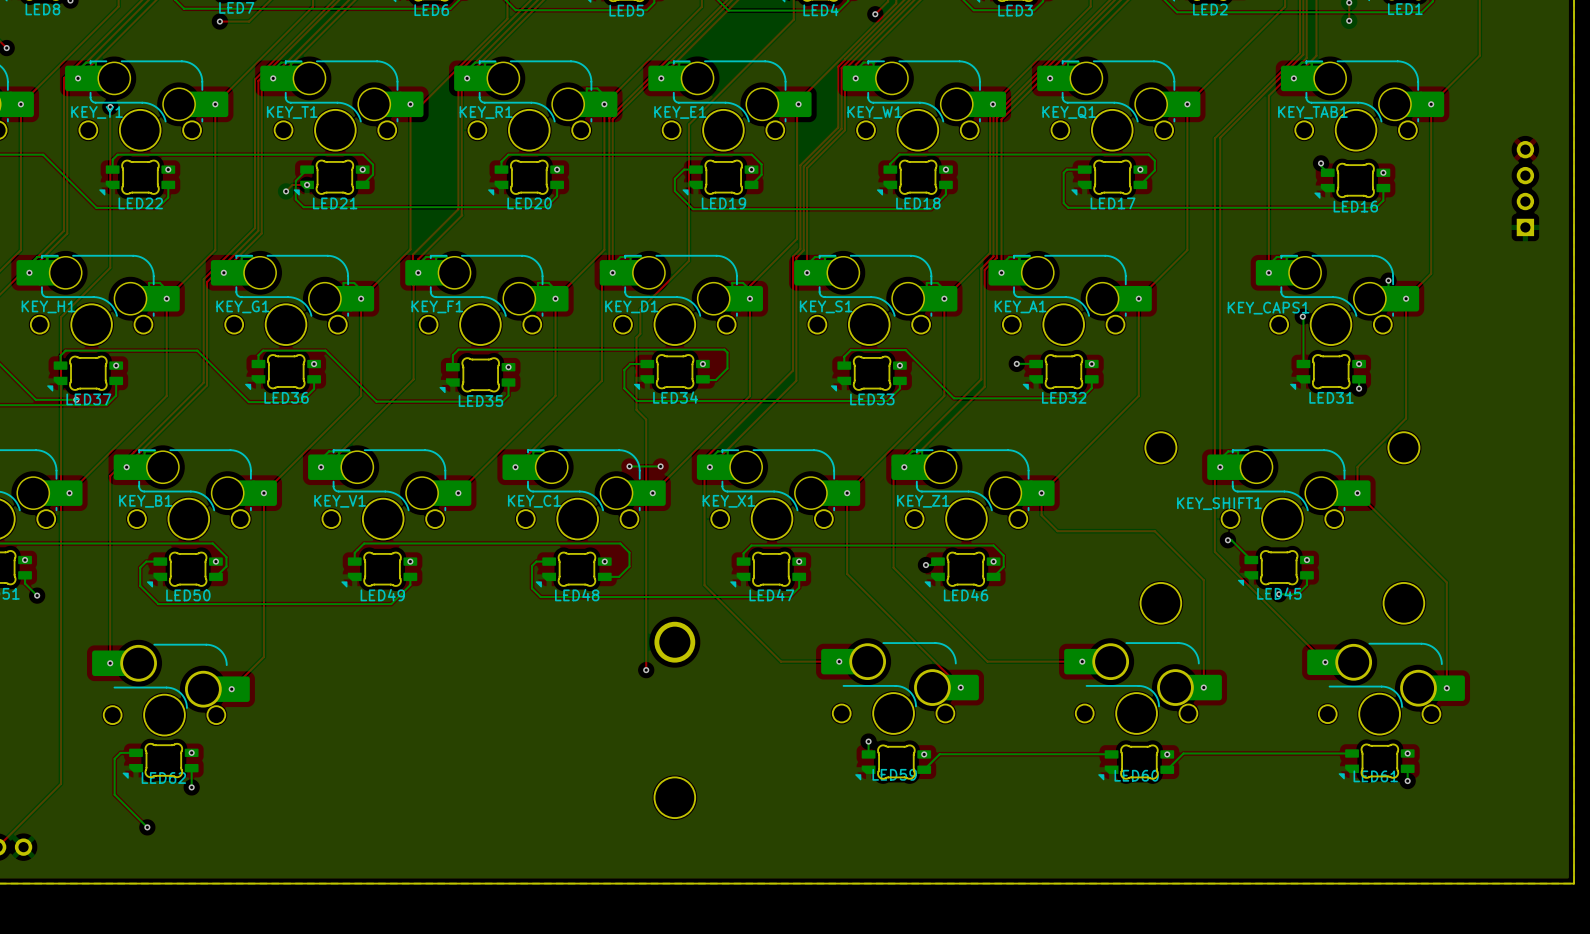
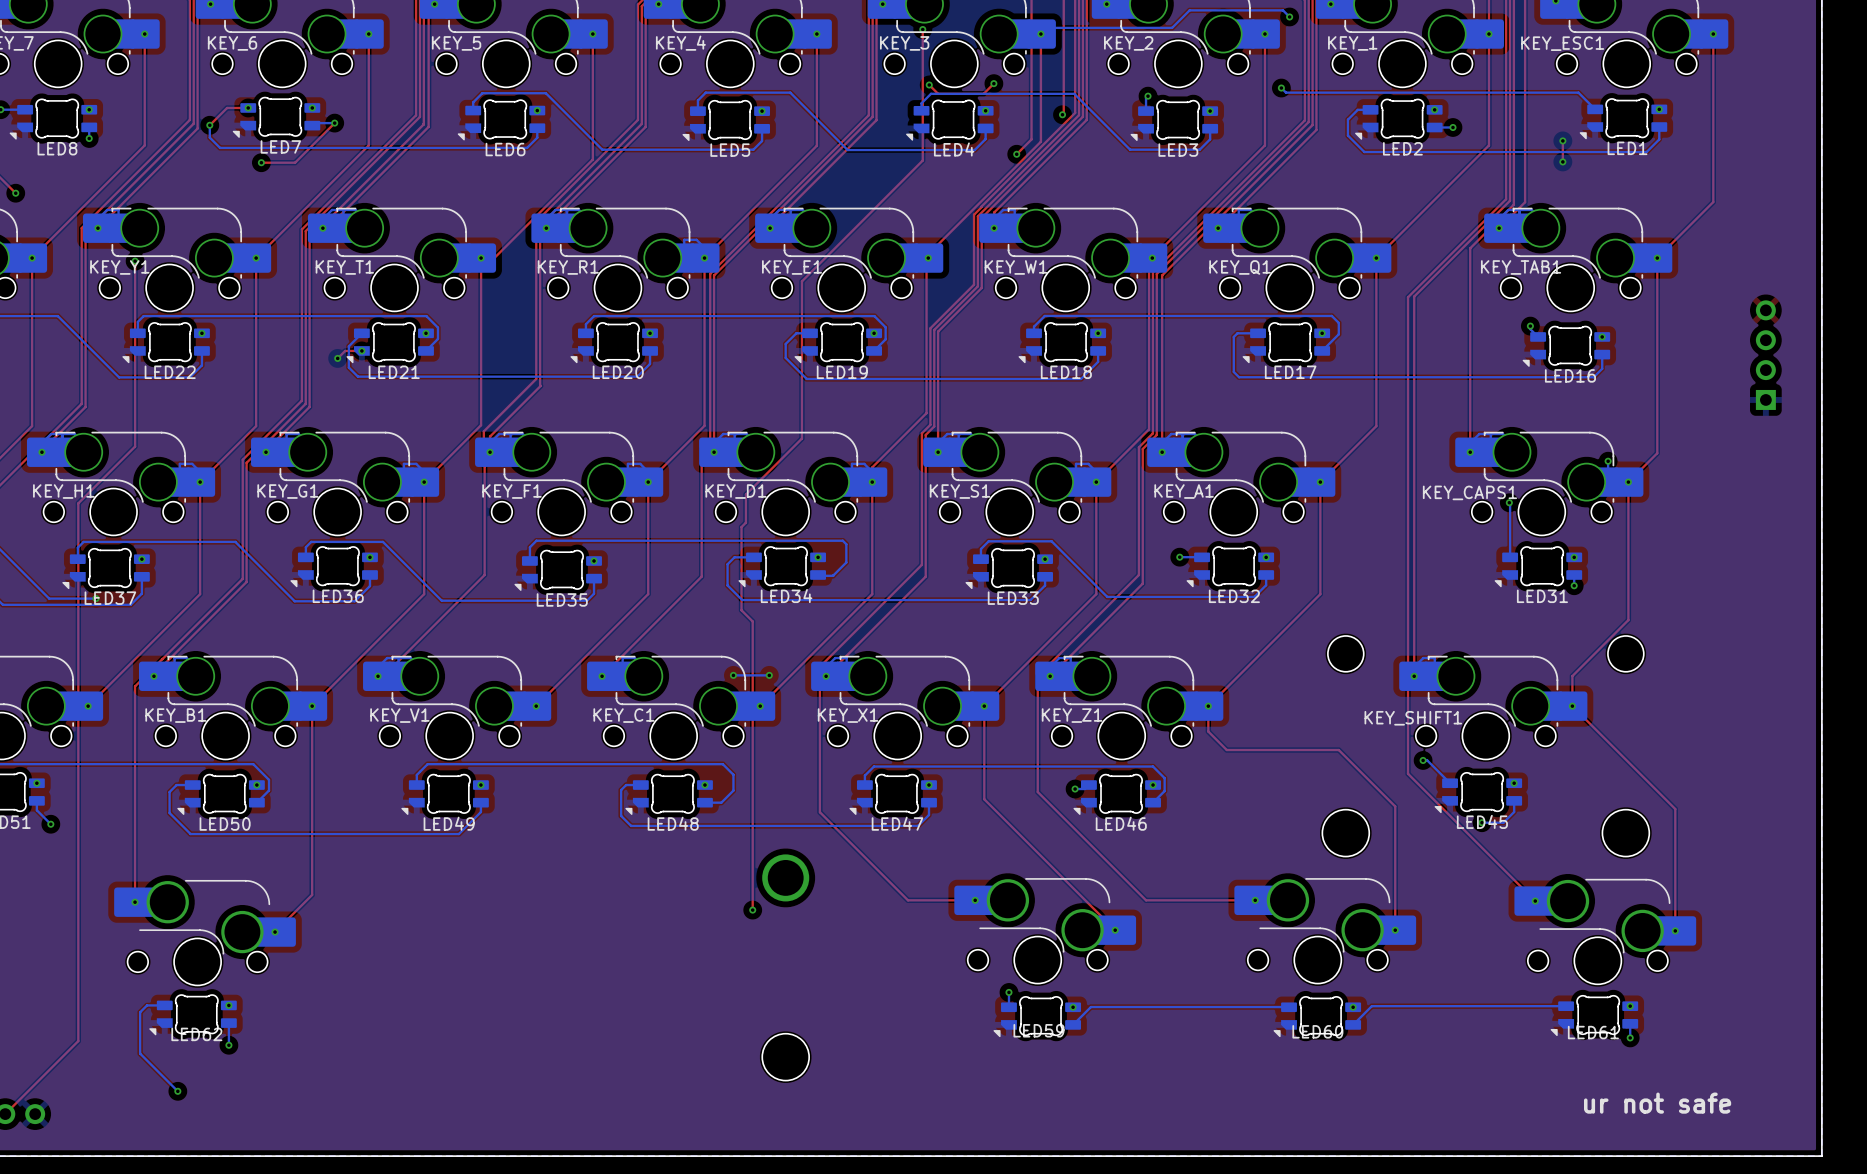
text: none -> ur not safe (1657, 1103)

